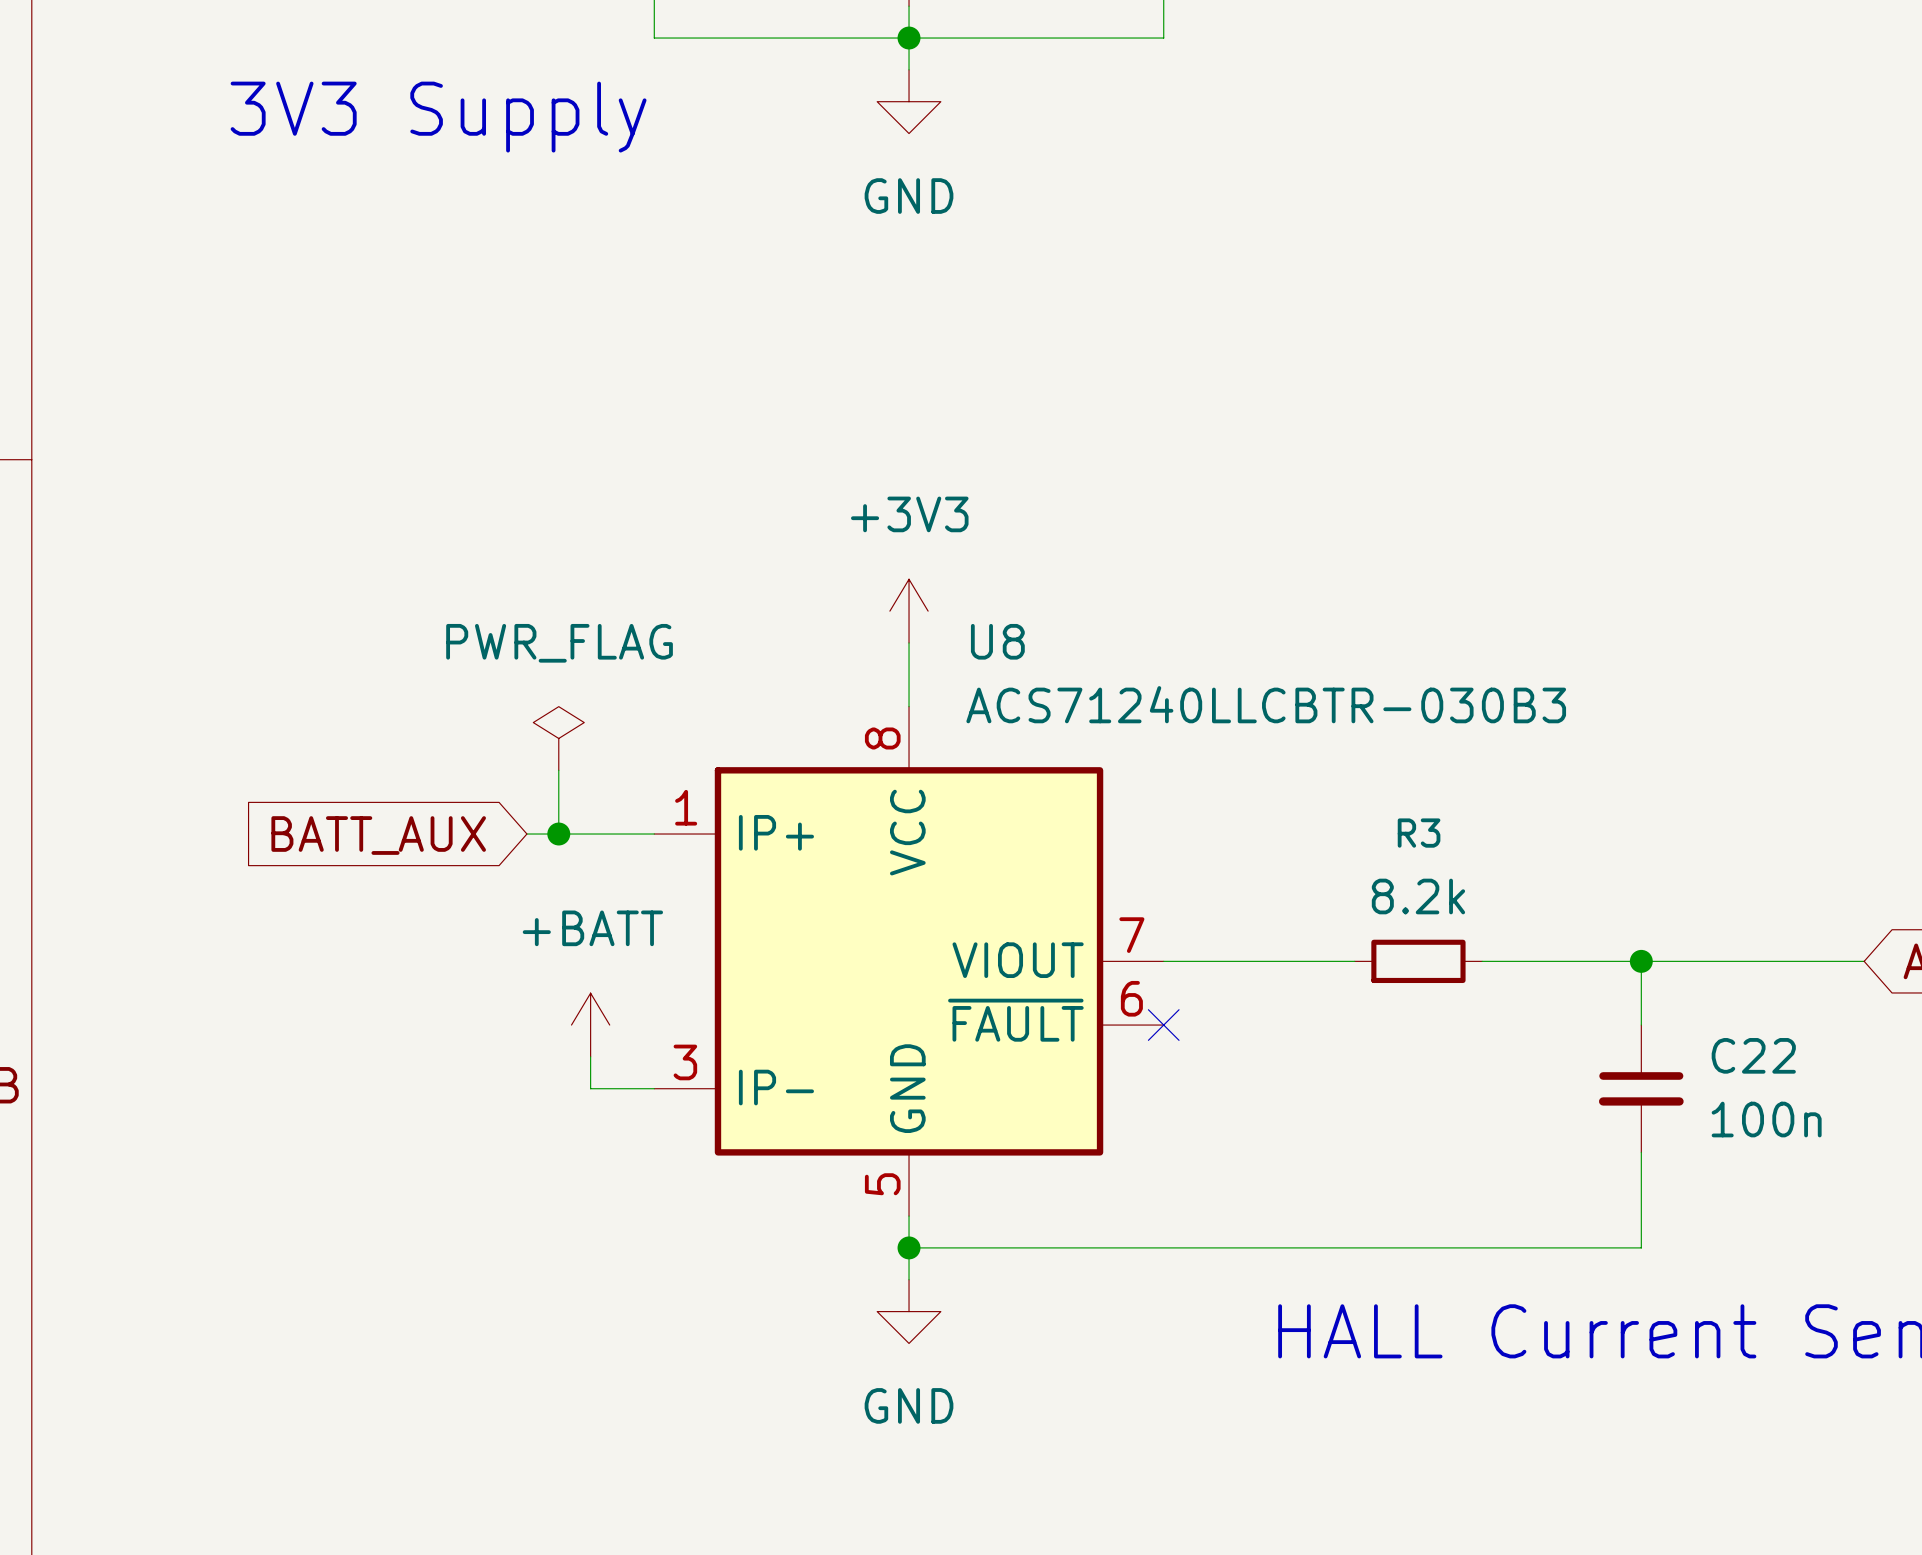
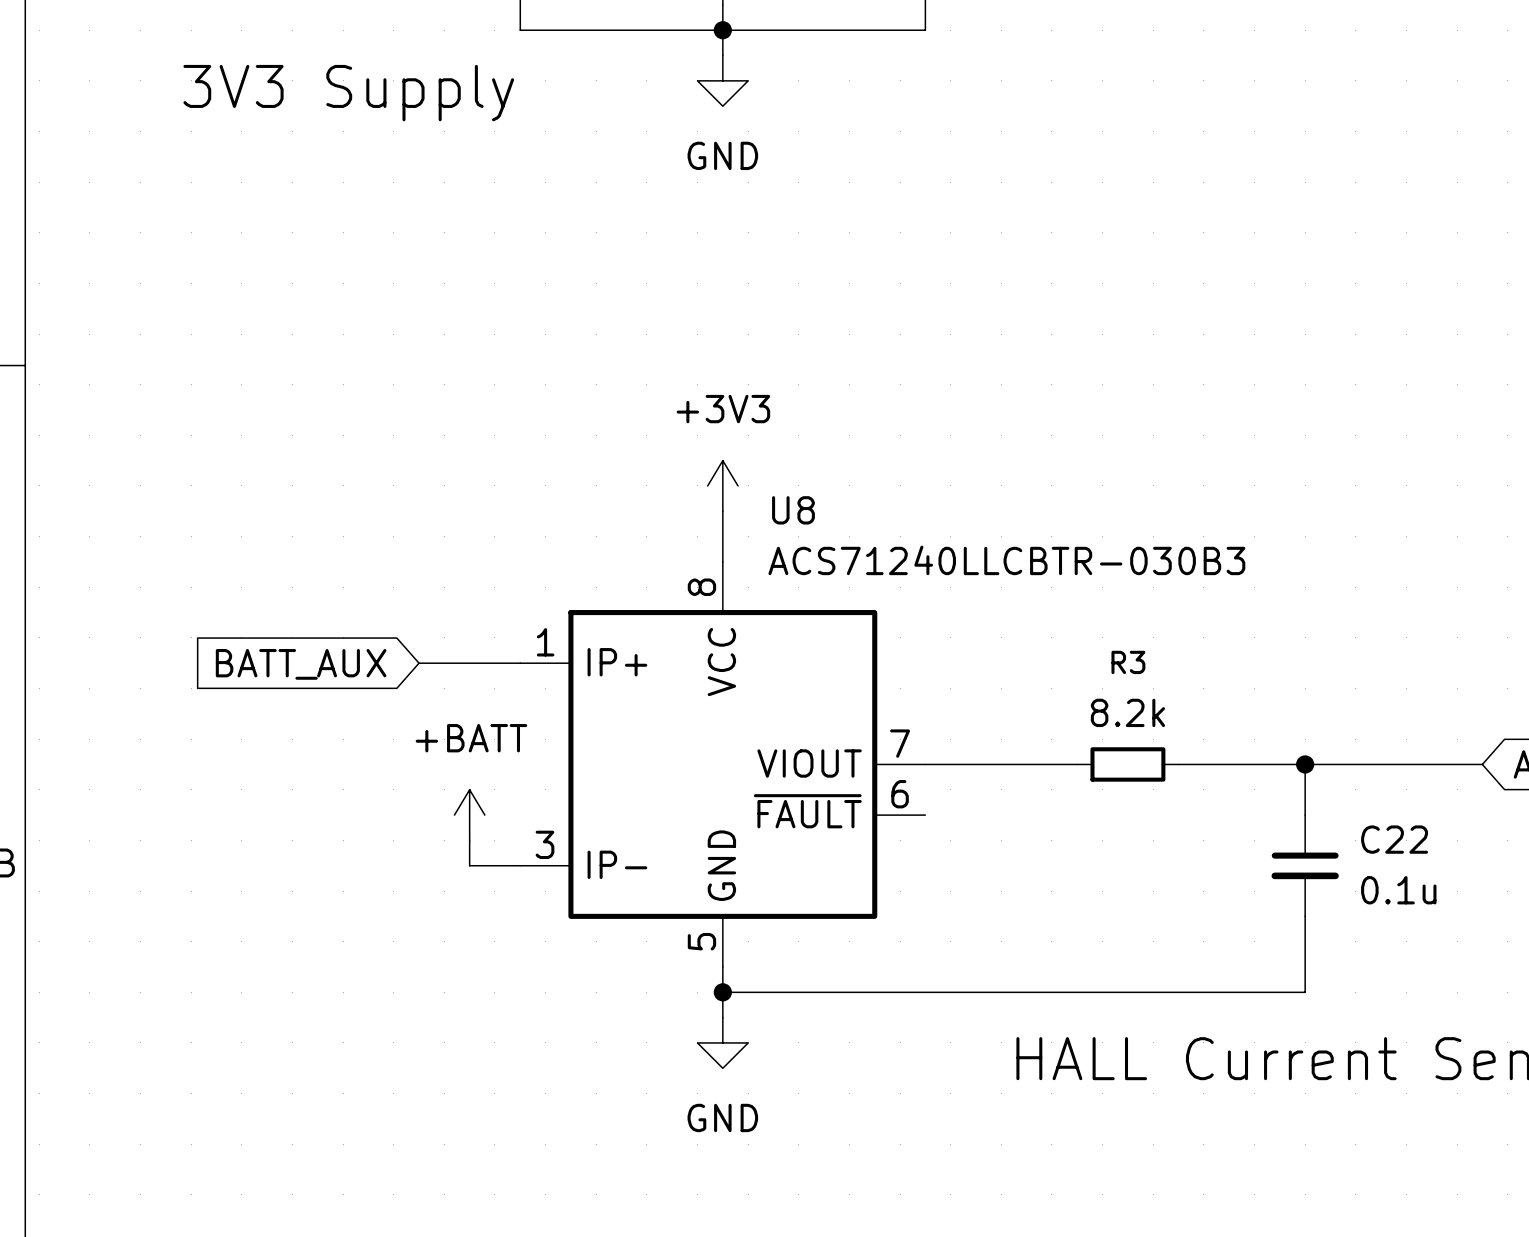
power symbol: PWR_FLAG (558, 738) -> none
wire: (558, 770) (558, 834) -> none
junction: (558, 834) -> none
no-connect mark: (1163, 1025) -> none
C22 value: 100n (1766, 1119) -> 0.1u (1398, 890)

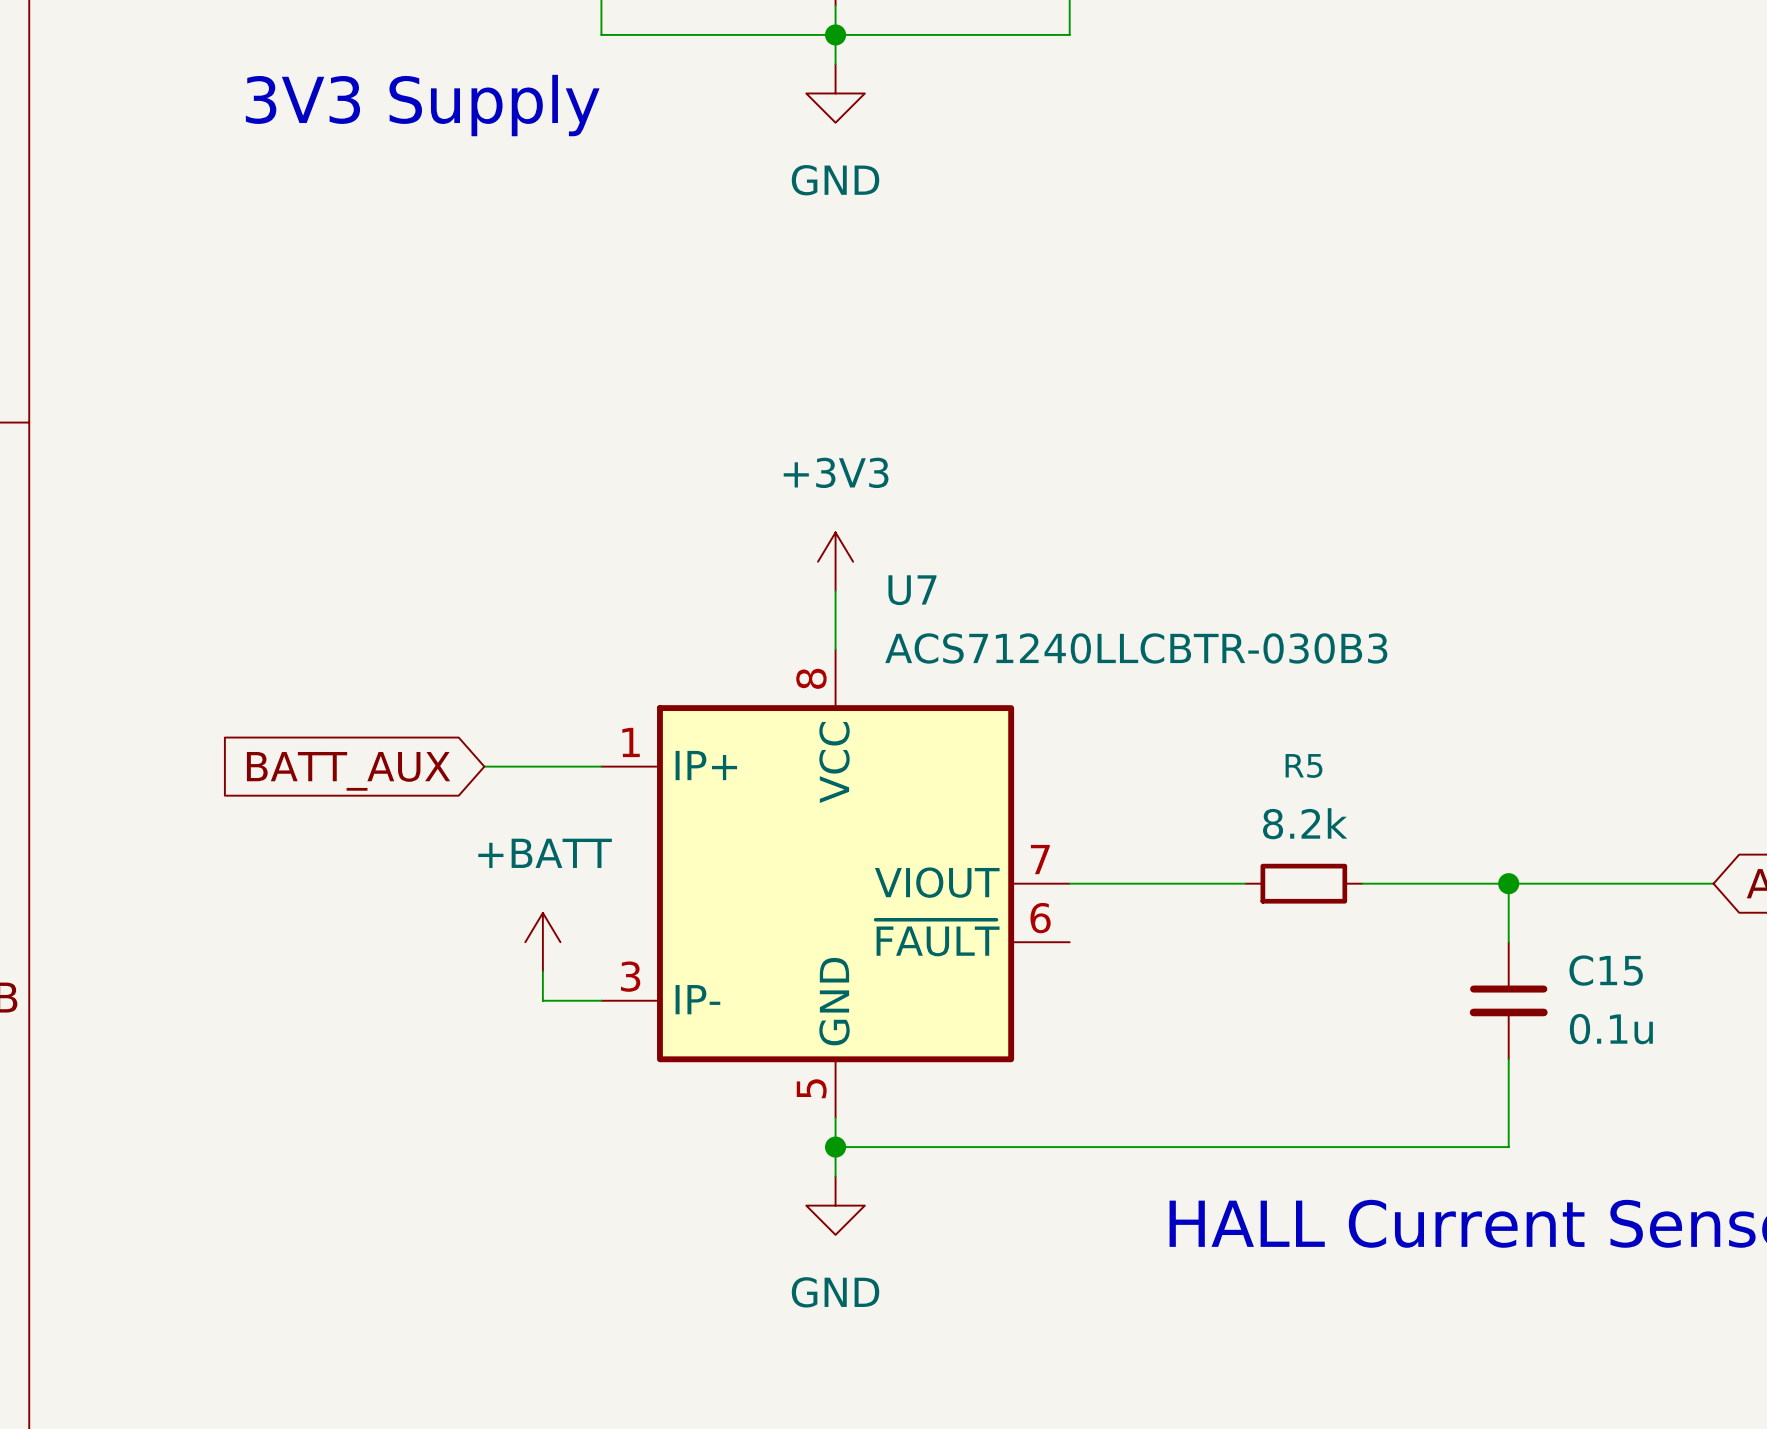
U8 name: U8 (793, 510) -> U7 (912, 590)
R3 name: R3 (1128, 662) -> R5 (1304, 765)
C22 name: C22 (1394, 839) -> C15 (1606, 970)

